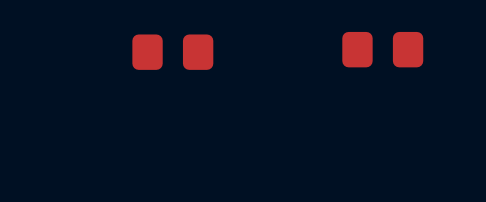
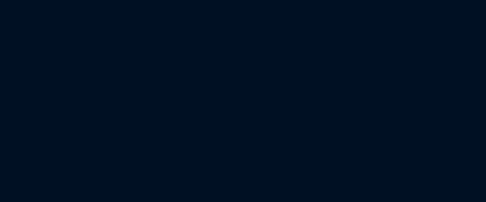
part: (382, 49) -> none
part: (172, 52) -> none

